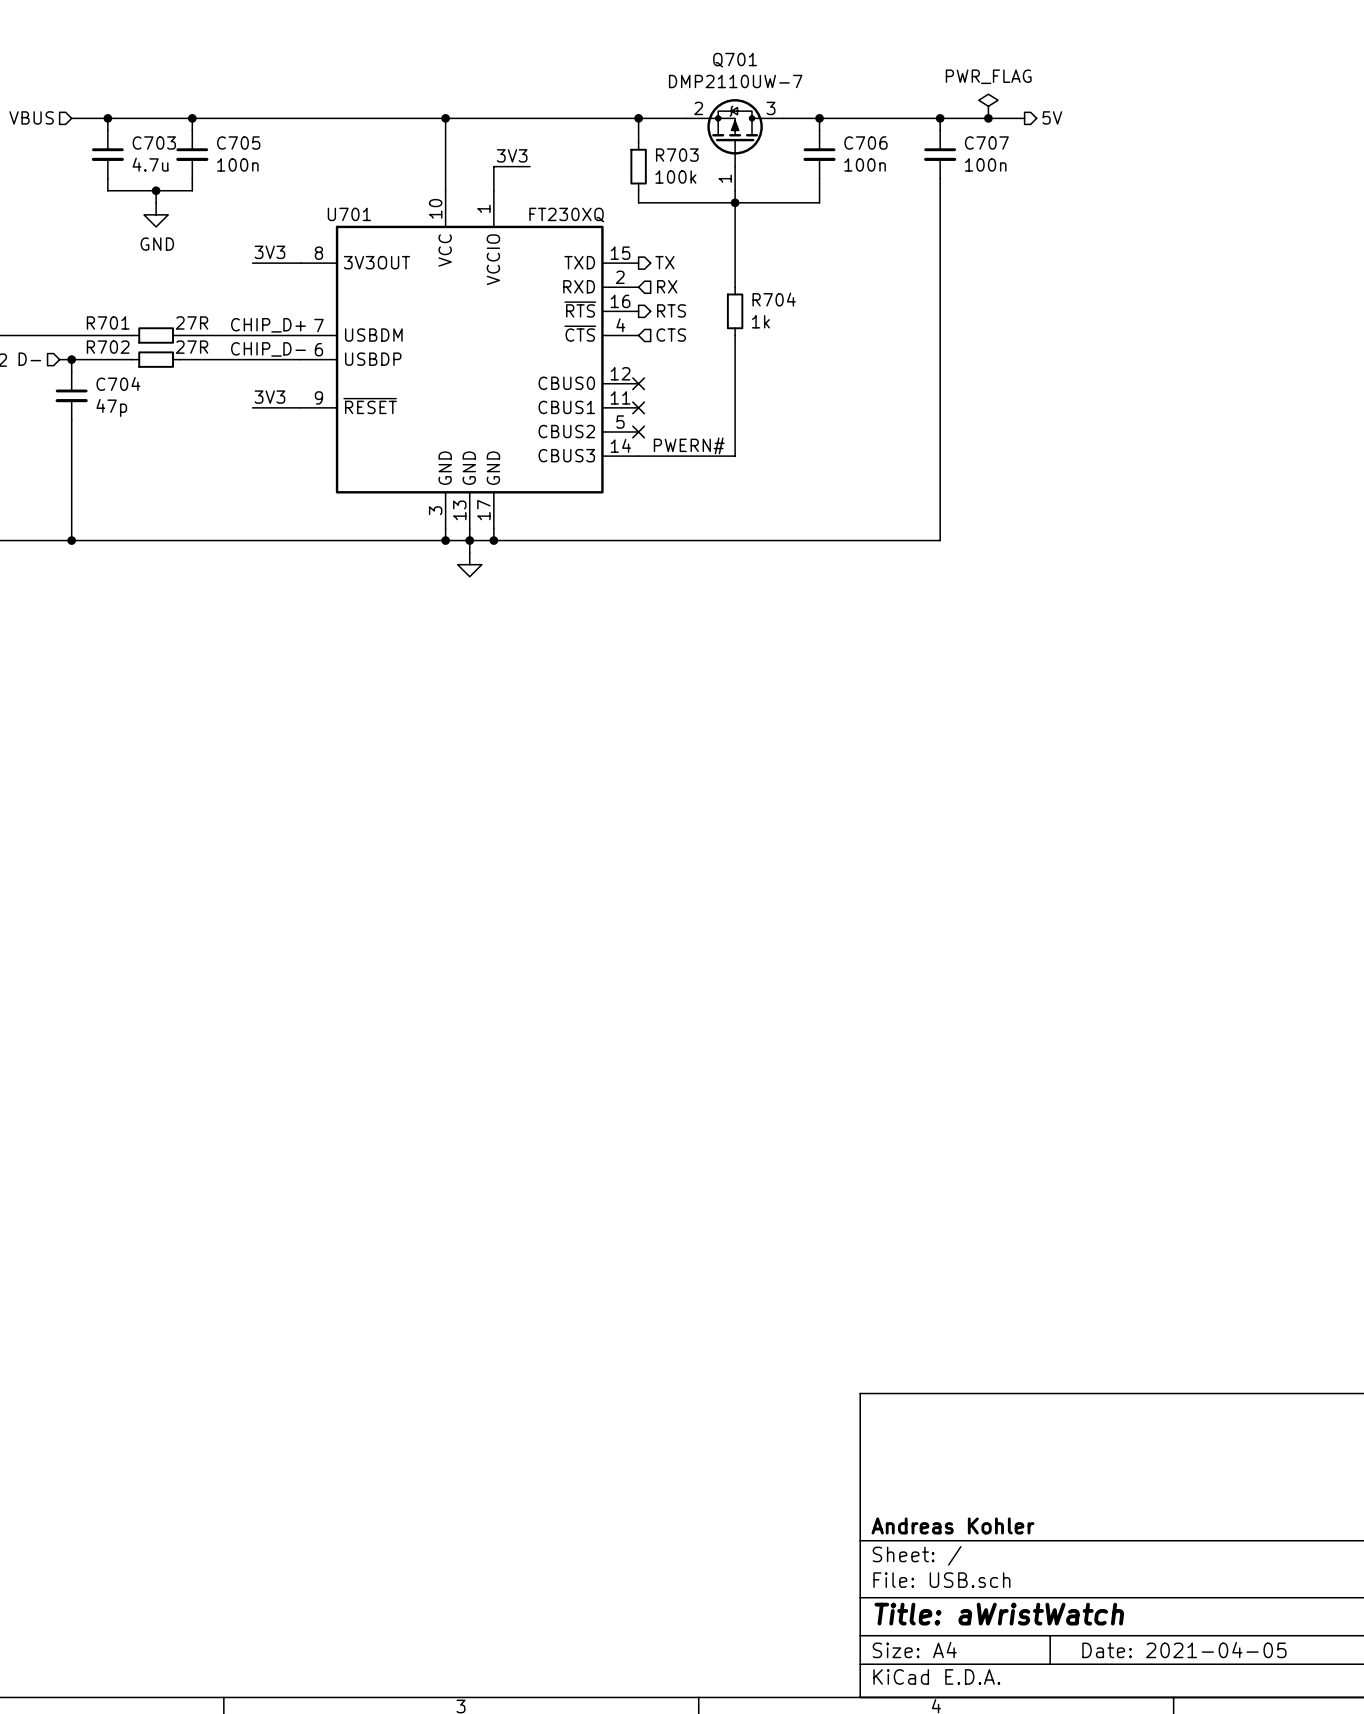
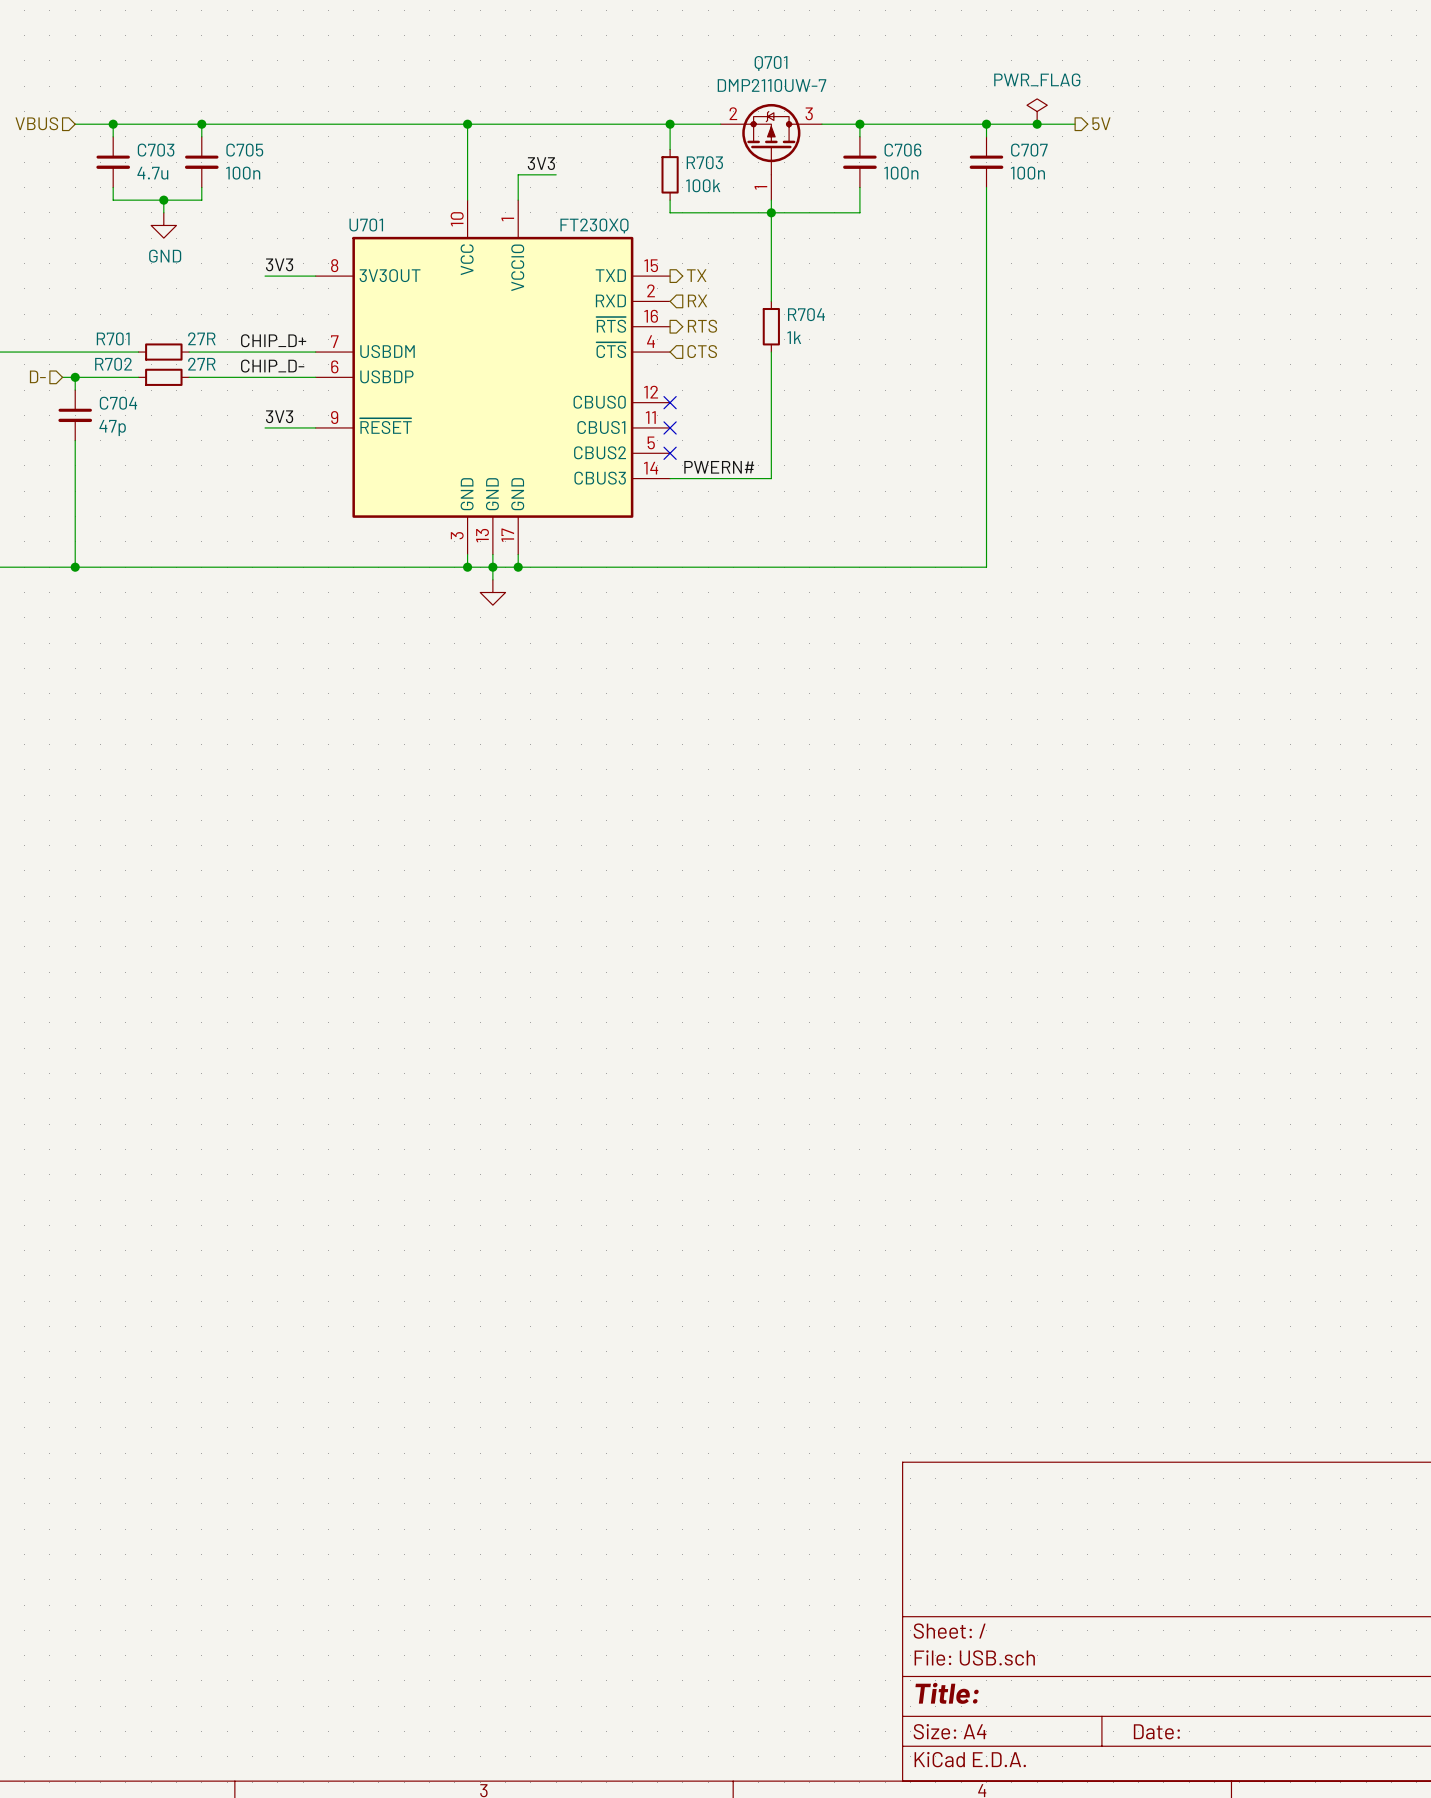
title block: Andreas Kohler (953, 1525) -> none
title block: Title: aWristWatch (999, 1614) -> Title: (947, 1693)
title block: Date: 2021-04-05 (1184, 1650) -> Date: (1156, 1731)

